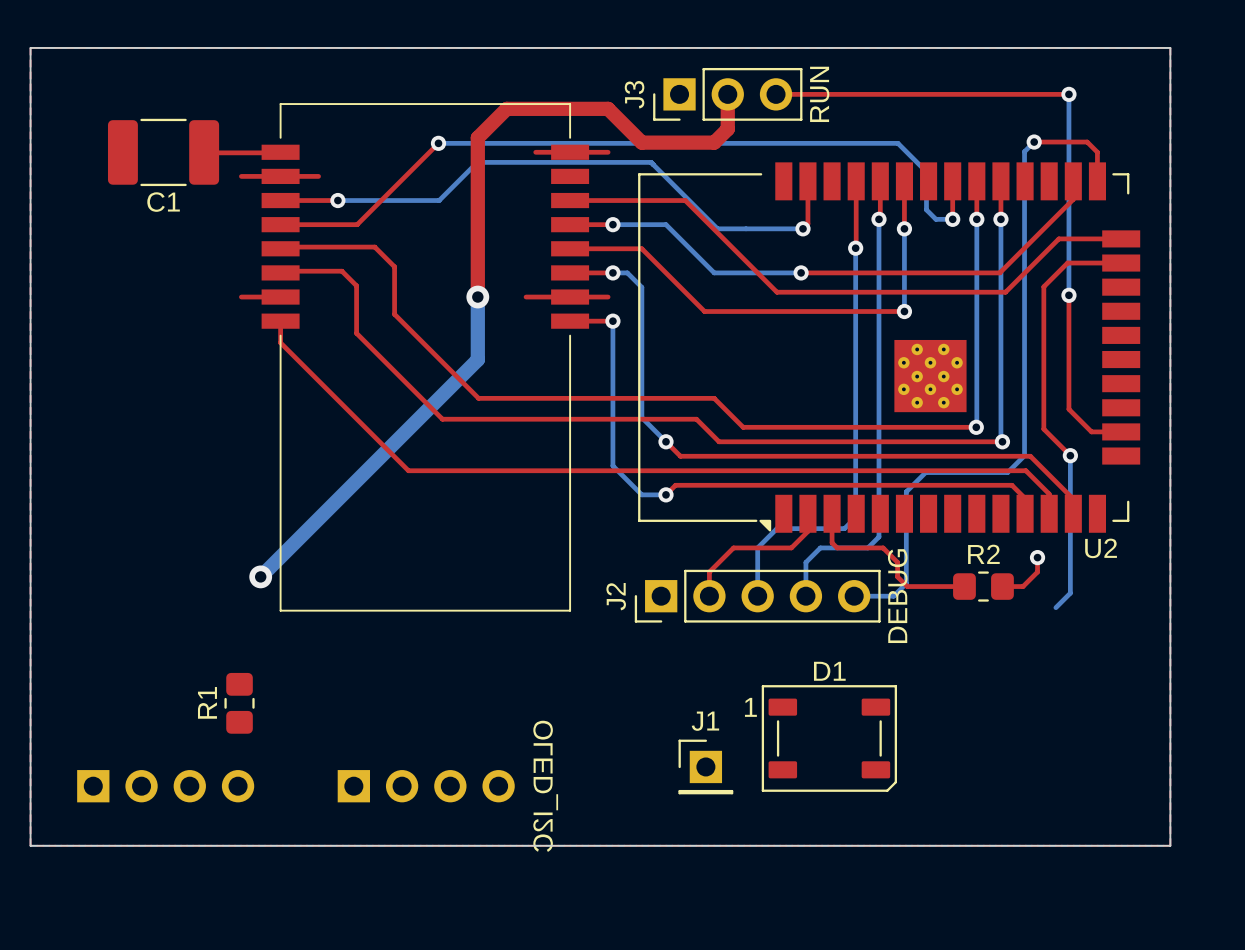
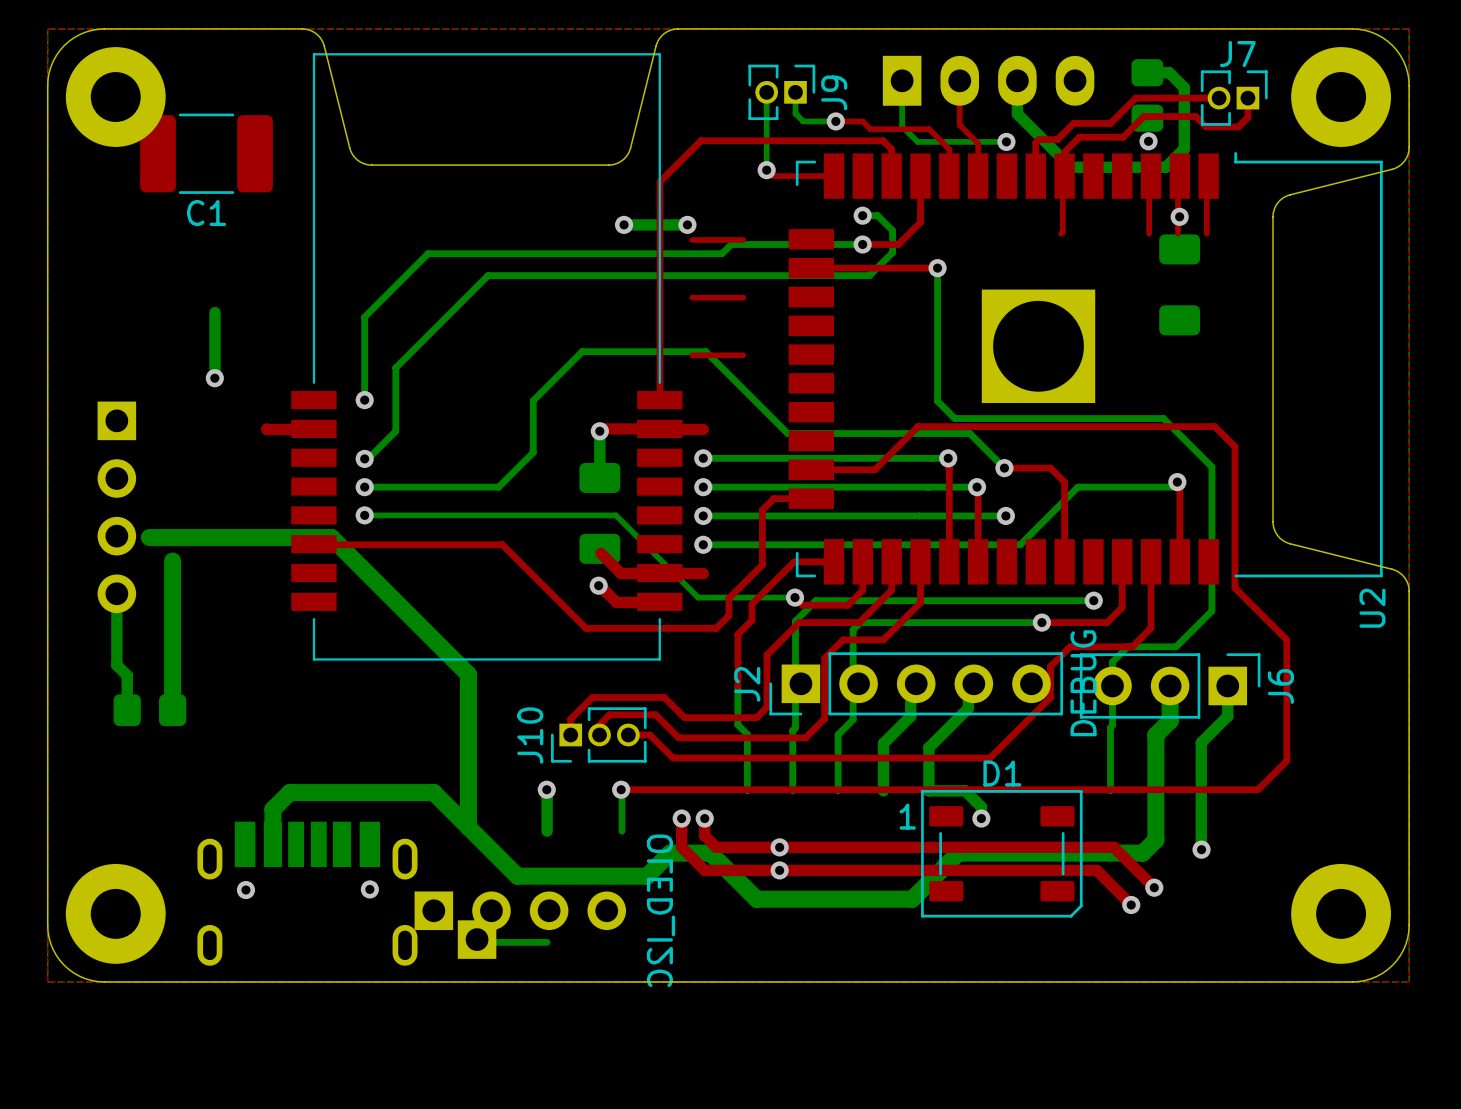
board edge: (78, 47) (30, 47) (30, 95) -> (104, 28) (85, 32) (64, 45) (50, 66) (47, 85)
board edge: (243, 47) (558, 47) -> (302, 28) (314, 32) (322, 41) (350, 150) (357, 160) (371, 165) (608, 165) (618, 162) (624, 158) (629, 150) (657, 41) (666, 32) (678, 28)
board edge: (1122, 47) (1170, 47) (1170, 95) -> (1352, 28) (1371, 32) (1392, 45) (1403, 61) (1409, 85)
bottom track: none -> (1147, 72) (1169, 72) (1184, 87) (1184, 148) (1165, 167) (1070, 167) (1017, 113) (1017, 80)
bottom track: none -> (902, 80) (902, 126) (917, 141) (1006, 141)
top track: none -> (959, 80) (959, 125) (978, 143) (978, 176)
part: none -> (988, 80)
top track: (727, 94) (727, 129) (714, 142) (641, 142) (608, 108) (506, 108) (477, 137) (477, 297) -> none
J3: RUN (727, 94) -> none
top track: (776, 94) (1068, 94) -> none
bottom track: (1068, 94) (1068, 295) -> none
via: (1068, 94) -> none
bottom track: none -> (766, 92) (766, 170)
J9: none -> (781, 92)
bottom track: none -> (795, 92) (795, 113) (803, 121) (835, 121)
part: none -> (1147, 95)
part: none -> (115, 97)
part: none -> (1341, 97)
top track: none -> (1219, 98) (1135, 98) (1110, 123) (1073, 123) (1057, 139) (1039, 139) (1035, 142) (1035, 176)
J7: none -> (1234, 98)
top track: none -> (1247, 98) (1247, 117) (1238, 126) (1206, 126) (1195, 116) (1143, 116) (1123, 137) (1079, 137) (1064, 152) (1064, 176)
top track: none -> (835, 121) (862, 121) (870, 129) (929, 129) (949, 149) (949, 176)
via: none -> (835, 121)
via: none -> (1006, 141)
via: none -> (1148, 141)
top track: (1034, 142) (1087, 142) (1097, 152) (1097, 181) -> none
bottom track: (1034, 142) (1024, 151) (1024, 455) (1007, 472) (925, 472) (906, 491) (906, 583) (893, 596) (854, 596) -> none
via: (1034, 142) -> none
top track: (438, 143) (357, 224) (280, 224) -> none
bottom track: (438, 143) (897, 143) (926, 171) (926, 209) (935, 219) (952, 219) -> none
via: (438, 143) -> none
board edge: (1170, 147) (1170, 518) -> (1409, 147) (1404, 161) (1394, 168) (1285, 196) (1276, 204) (1273, 216) (1274, 529) (1279, 537) (1287, 543) (1396, 570) (1405, 579) (1409, 591)
top track: (280, 152) (207, 152) -> none
top track: (535, 152) (608, 152) -> none
U2 footprint: [638, 162, 1141, 533] -> [788, 152, 1383, 585]
top track: none -> (766, 170) (772, 176) (834, 176)
via: none -> (766, 170)
top track: none -> (891, 176) (891, 149) (883, 140) (700, 140) (660, 181) (660, 400)
top track: none -> (920, 176) (920, 222) (898, 244) (862, 244)
top track: (241, 176) (318, 176) -> none
top track: (807, 181) (807, 223) (803, 228) -> none
top track: (856, 181) (855, 248) -> none
top track: (904, 181) (904, 228) -> none
top track: (1073, 181) (1073, 199) (999, 272) (801, 272) -> none
top track: (280, 200) (337, 200) -> none
bottom track: (337, 200) (439, 200) (477, 162) (651, 162) (717, 228) (803, 228) -> none
via: (337, 200) -> none
top track: (570, 200) (685, 200) (776, 292) (1005, 292) (1058, 238) (1121, 238) -> none
bottom track: none -> (862, 215) (877, 215) (892, 230) (892, 252) (869, 275) (488, 275) (395, 367) (395, 431) (368, 458) (364, 458)
via: none -> (862, 215)
bottom track: none -> (624, 224) (687, 224)
via: none -> (624, 224)
via: none -> (687, 224)
bottom track: (878, 219) (878, 536) (867, 547) (820, 547) (805, 562) (805, 596) -> none
via: (878, 219) -> none
via: (952, 219) -> none
bottom track: (976, 219) (976, 427) -> none
via position: (976, 219) -> (1179, 216)
bottom track: (1000, 219) (1000, 440) (1002, 441) -> none
via: (1000, 219) -> none
bottom track: (612, 224) (666, 224) (714, 272) (801, 272) -> none
via: (612, 224) -> none
bottom track: none -> (862, 244) (731, 244) (722, 253) (428, 253) (364, 317) (364, 400)
via: none -> (862, 244)
via: (803, 228) -> none
bottom track: (904, 228) (904, 311) -> none
via: (904, 228) -> none
top track: (280, 248) (282, 247) (374, 247) (394, 266) (394, 314) (478, 398) (714, 398) (743, 427) (976, 427) -> none
top track: (570, 248) (641, 248) (704, 311) (904, 311) -> none
top track: none -> (811, 268) (937, 268)
bottom track: none -> (937, 268) (937, 401) (954, 418) (1163, 418) (1211, 466) (1211, 611) (1176, 646) (1127, 646) (1112, 662) (1110, 790)
via: none -> (937, 268)
bottom track: (855, 248) (855, 517) (844, 528) (776, 528) (757, 547) (757, 596) -> none
via: (855, 248) -> none
part: none -> (1179, 284)
top track: (1121, 263) (1067, 263) (1043, 286) (1043, 429) (1070, 455) -> none
top track: (280, 272) (282, 271) (341, 271) (356, 285) (356, 333) (442, 419) (696, 419) (719, 441) (1002, 441) -> none
bottom track: (612, 272) (627, 272) (641, 287) (641, 417) (666, 441) -> none
via: (612, 272) -> none
via: (801, 272) -> none
bottom track: none -> (215, 312) (215, 378)
top track: (1068, 295) (1068, 409) (1091, 431) (1121, 431) -> none
via: (1068, 295) -> none
top track: (241, 297) (280, 297) -> none
bottom track: (477, 297) (477, 359) (260, 576) -> none
via: (477, 297) -> none
top track: (526, 297) (608, 297) -> none
via: (904, 311) -> none
top track: (280, 321) (280, 342) (408, 470) (1025, 470) (1049, 494) (1049, 513) -> none
bottom track: (612, 321) (612, 465) (641, 494) (666, 494) -> none
via: (612, 321) -> none
via: none -> (214, 378)
part rotation: 0° (425, 357) -> 180° (486, 356)
via: none -> (364, 400)
top track: none -> (266, 428) (314, 429)
top track: none -> (659, 428) (602, 428) (599, 431)
top track: none -> (660, 429) (703, 429)
bottom track: none -> (599, 431) (599, 477)
via: none -> (599, 431)
via: none -> (364, 458)
bottom track: none -> (703, 458) (948, 458)
via: none -> (703, 458)
top track: none -> (948, 458) (949, 561)
via: none -> (948, 458)
top track: none -> (1004, 468) (1050, 468) (1064, 482) (1064, 561)
bottom track: none -> (1004, 468) (969, 433) (787, 433) (705, 351) (582, 351) (533, 400) (533, 452) (498, 487) (364, 487)
via: none -> (1004, 468)
top track: none -> (811, 469) (874, 469) (917, 426) (1214, 426) (1234, 446) (1234, 588) (1286, 639) (1286, 760) (1258, 789) (621, 789)
via: none -> (364, 487)
bottom track: none -> (703, 487) (977, 487)
via: none -> (703, 487)
top track: none -> (977, 487) (978, 561)
via: none -> (977, 487)
top track: none -> (1178, 487) (1179, 561)
bottom track: none -> (1178, 487) (1077, 487) (1020, 544) (703, 544)
top track: (666, 441) (680, 456) (1030, 456) (1073, 499) (1073, 513) -> none
via: (666, 441) -> none
top track: none -> (811, 498) (773, 498) (762, 510) (762, 564) (728, 598) (728, 615) (716, 628) (586, 628) (502, 544) (314, 544)
via: (1002, 441) -> none
part: none -> (599, 513)
bottom track: none -> (364, 515) (615, 515) (698, 597) (795, 597)
via: none -> (364, 515)
bottom track: none -> (703, 515) (1005, 515)
via: none -> (703, 515)
via: none -> (1005, 515)
bottom track: (1070, 455) (1070, 593) (1055, 607) -> none
via: (1070, 455) -> none
bottom track: none -> (149, 537) (331, 537) (468, 674) (468, 827)
via: none -> (703, 544)
top track: none -> (600, 553) (621, 573) (703, 573)
bottom track: none -> (172, 561) (172, 710)
top track: (666, 494) (675, 485) (1011, 485) (1025, 498) (1025, 513) -> none
via position: (666, 494) -> (795, 597)
top track: none -> (834, 561) (794, 561) (751, 604) (751, 620) (737, 634) (737, 685)
top track: none -> (862, 561) (862, 590) (847, 605) (802, 605) (795, 597)
top track: none -> (891, 561) (891, 590) (859, 622) (799, 622) (766, 654) (766, 707) (756, 717) (684, 717) (664, 697) (592, 697) (570, 719) (570, 734)
top track: none -> (920, 561) (920, 602) (883, 639) (843, 639) (824, 658) (824, 718) (805, 737) (678, 737) (655, 714) (609, 714) (599, 724) (599, 734)
top track: none -> (1122, 561) (1122, 607) (1107, 622) (1041, 622)
top track: none -> (1151, 561) (1151, 628) (1132, 646) (1070, 646) (1050, 666) (1050, 697) (990, 758) (673, 758) (649, 734) (628, 734)
top track: (807, 513) (807, 531) (791, 547) (733, 547) (709, 572) (709, 596) -> none
top track: (832, 513) (832, 542) (837, 547) (883, 547) (897, 562) (897, 576) (907, 586) (964, 586) -> none
top track: none -> (598, 585) (616, 602) (660, 602)
via: none -> (598, 585)
bottom track: none -> (116, 593) (116, 665) (127, 675) (127, 710)
bottom track: none -> (1093, 600) (815, 600) (795, 621) (795, 727) (792, 730) (792, 790)
via: none -> (1093, 600)
bottom track: none -> (1041, 622) (860, 622) (853, 629) (853, 719) (838, 734) (838, 790)
via: none -> (1041, 622)
top track: (1037, 557) (1037, 572) (1023, 586) (1002, 586) -> none
via: (1037, 557) -> none
via: (260, 576) -> none
R2: (983, 586) -> none
bottom track: none -> (737, 685) (737, 724) (747, 734) (747, 790)
bottom track: none -> (910, 685) (910, 716) (883, 743) (883, 790)
bottom track: none -> (968, 685) (968, 708) (928, 747) (928, 790) (965, 790) (981, 807) (981, 818)
bottom track: none -> (1170, 685) (1170, 720) (1155, 735) (1155, 840) (1142, 853) (958, 853) (912, 899) (756, 899) (710, 853) (670, 853) (647, 876) (517, 876) (433, 792) (289, 792) (272, 809) (272, 852)
J6: none -> (1170, 685)
bottom track: none -> (1227, 685) (1227, 716) (1201, 742) (1201, 849)
J10: none -> (598, 734)
via: none -> (546, 789)
bottom track: none -> (621, 789) (621, 831)
via: none -> (621, 789)
bottom track: none -> (547, 795) (547, 831)
R1 side: top (239, 703) -> bottom (149, 710)
top track: none -> (681, 818) (681, 847) (704, 870) (1096, 870) (1131, 905)
via: none -> (681, 818)
top track: none -> (704, 818) (704, 835) (716, 847) (1113, 847) (1154, 887)
via: none -> (704, 818)
via: none -> (981, 818)
via: none -> (779, 847)
via: none -> (1201, 849)
via: none -> (779, 870)
J1 side: top (705, 766) -> bottom (477, 939)
via: none -> (1154, 887)
via: none -> (245, 890)
via: none -> (369, 889)
part: none -> (307, 893)
via: none -> (1131, 905)
part rotation: 0° (165, 786) -> 90° clockwise (116, 507)
part position: (165, 786) -> (116, 507)
part: none -> (115, 913)
part: none -> (1341, 913)
board edge: (30, 798) (30, 845) (78, 845) -> (47, 925) (53, 949) (64, 965) (79, 976) (104, 981)
board edge: (1170, 798) (1170, 845) (1122, 845) -> (1409, 925) (1403, 949) (1392, 965) (1371, 978) (1352, 981)
bottom track: none -> (477, 939) (479, 942) (547, 942)

